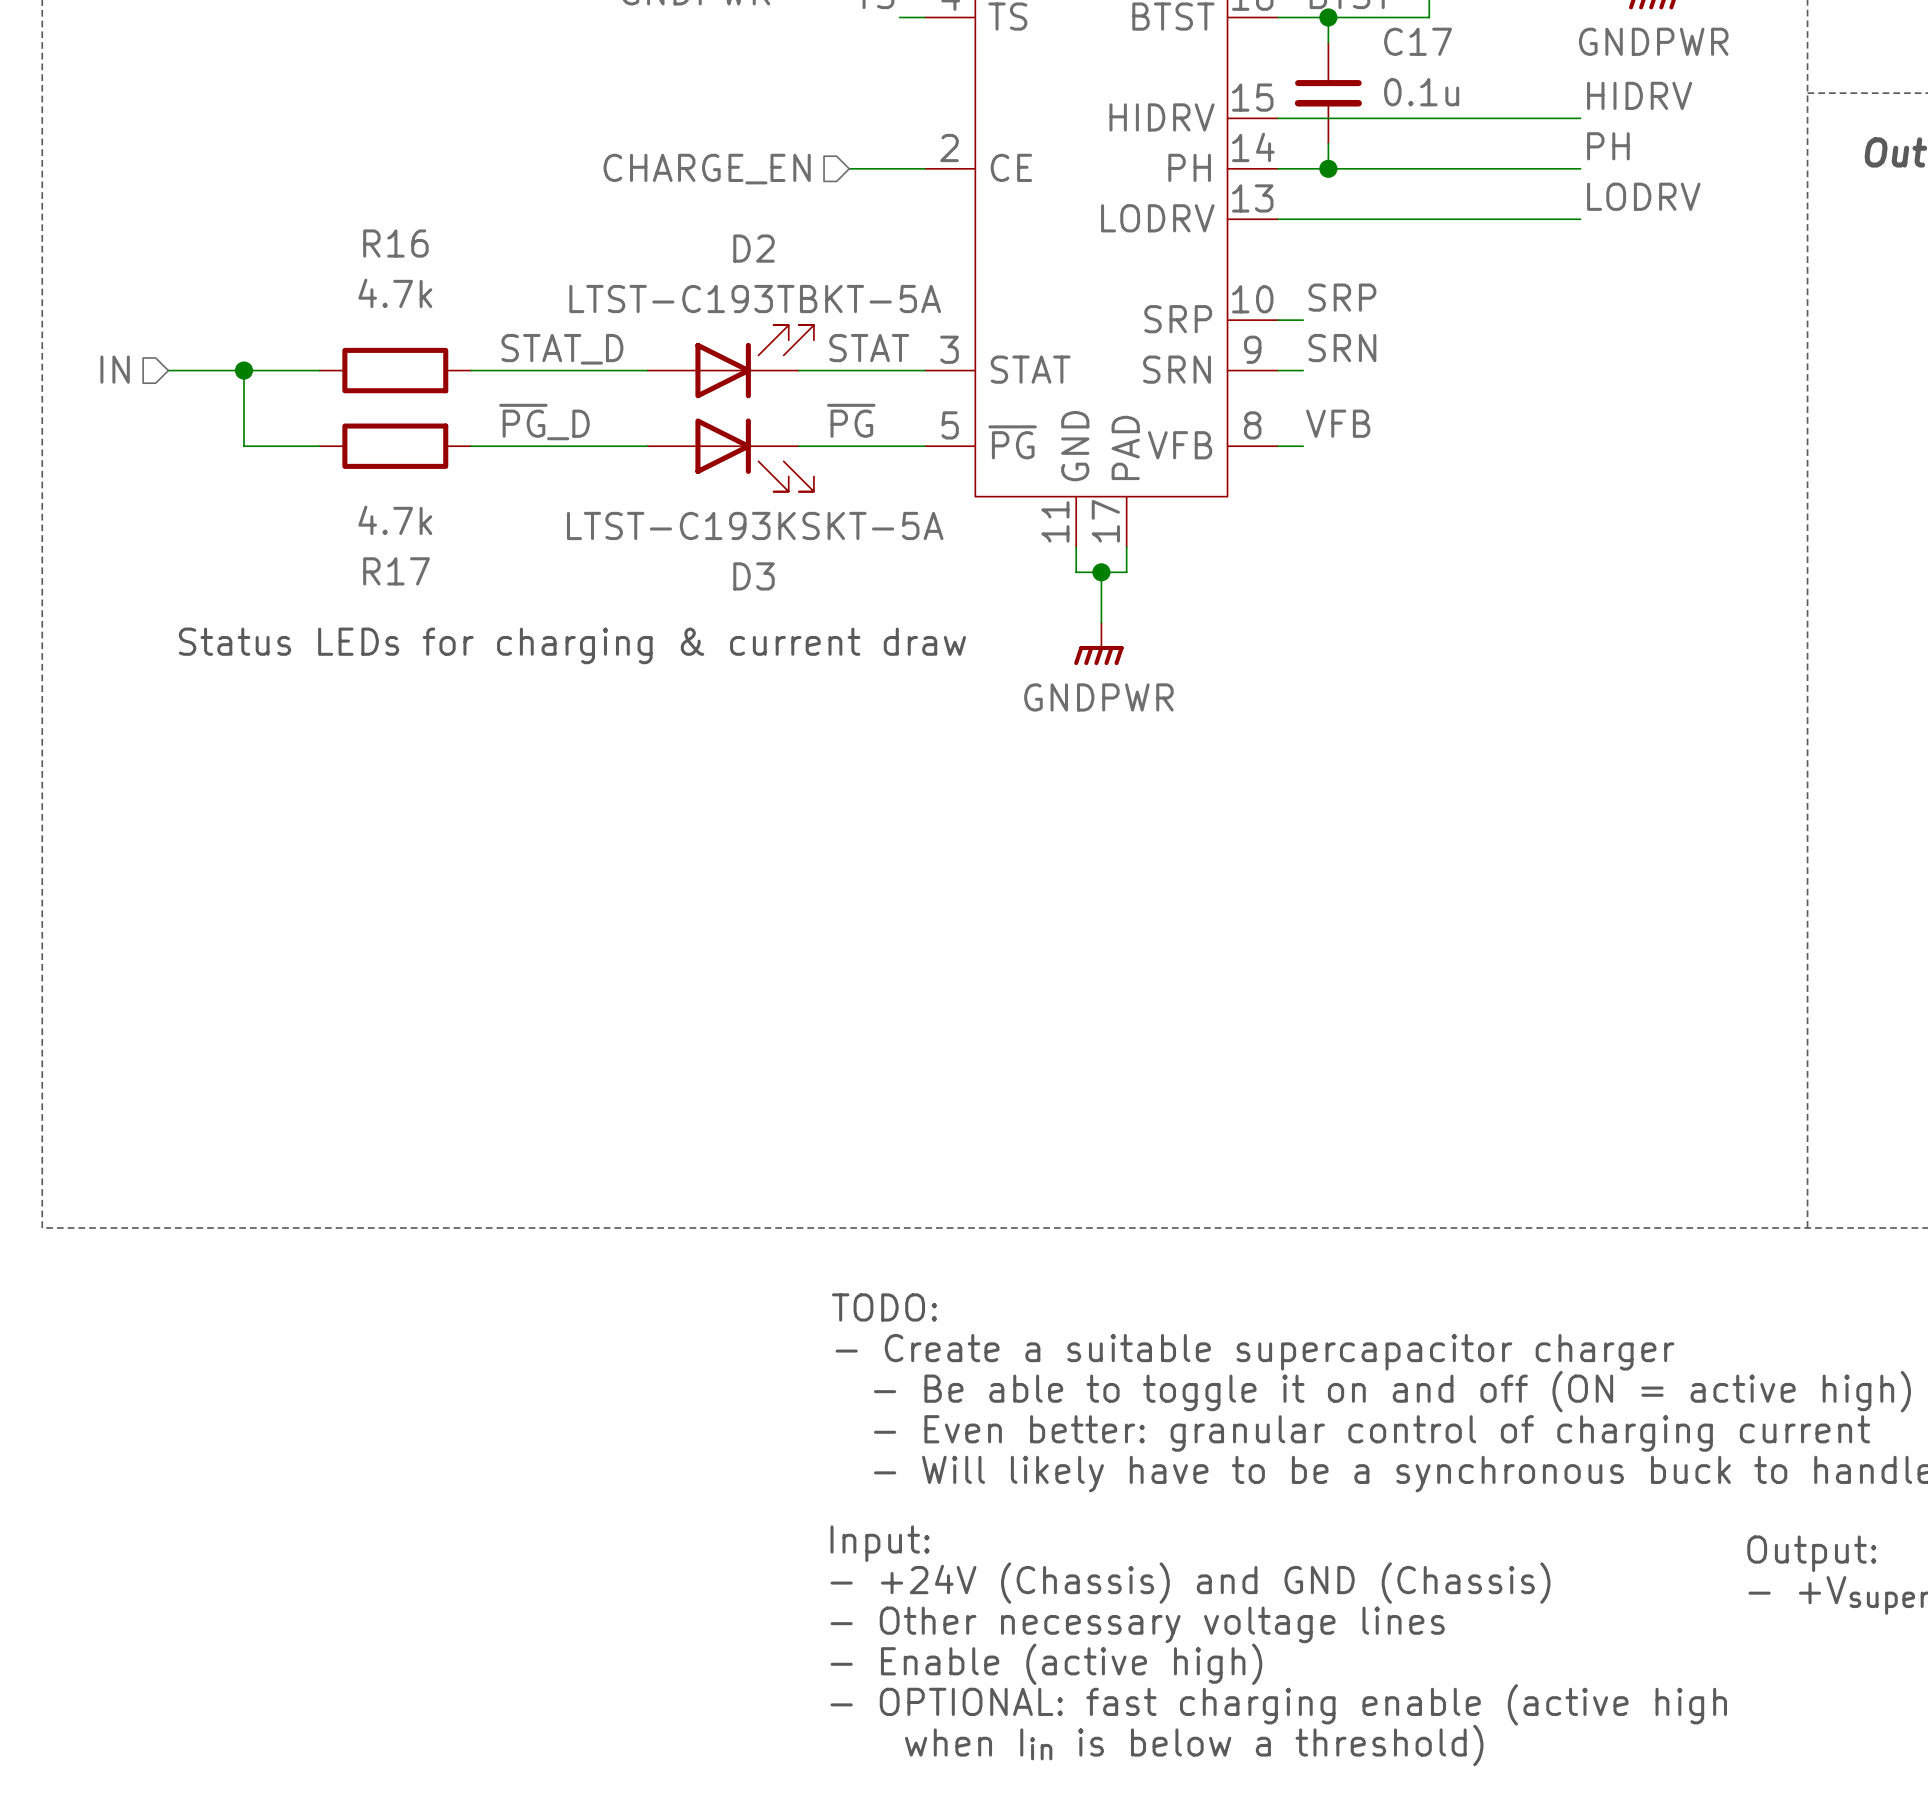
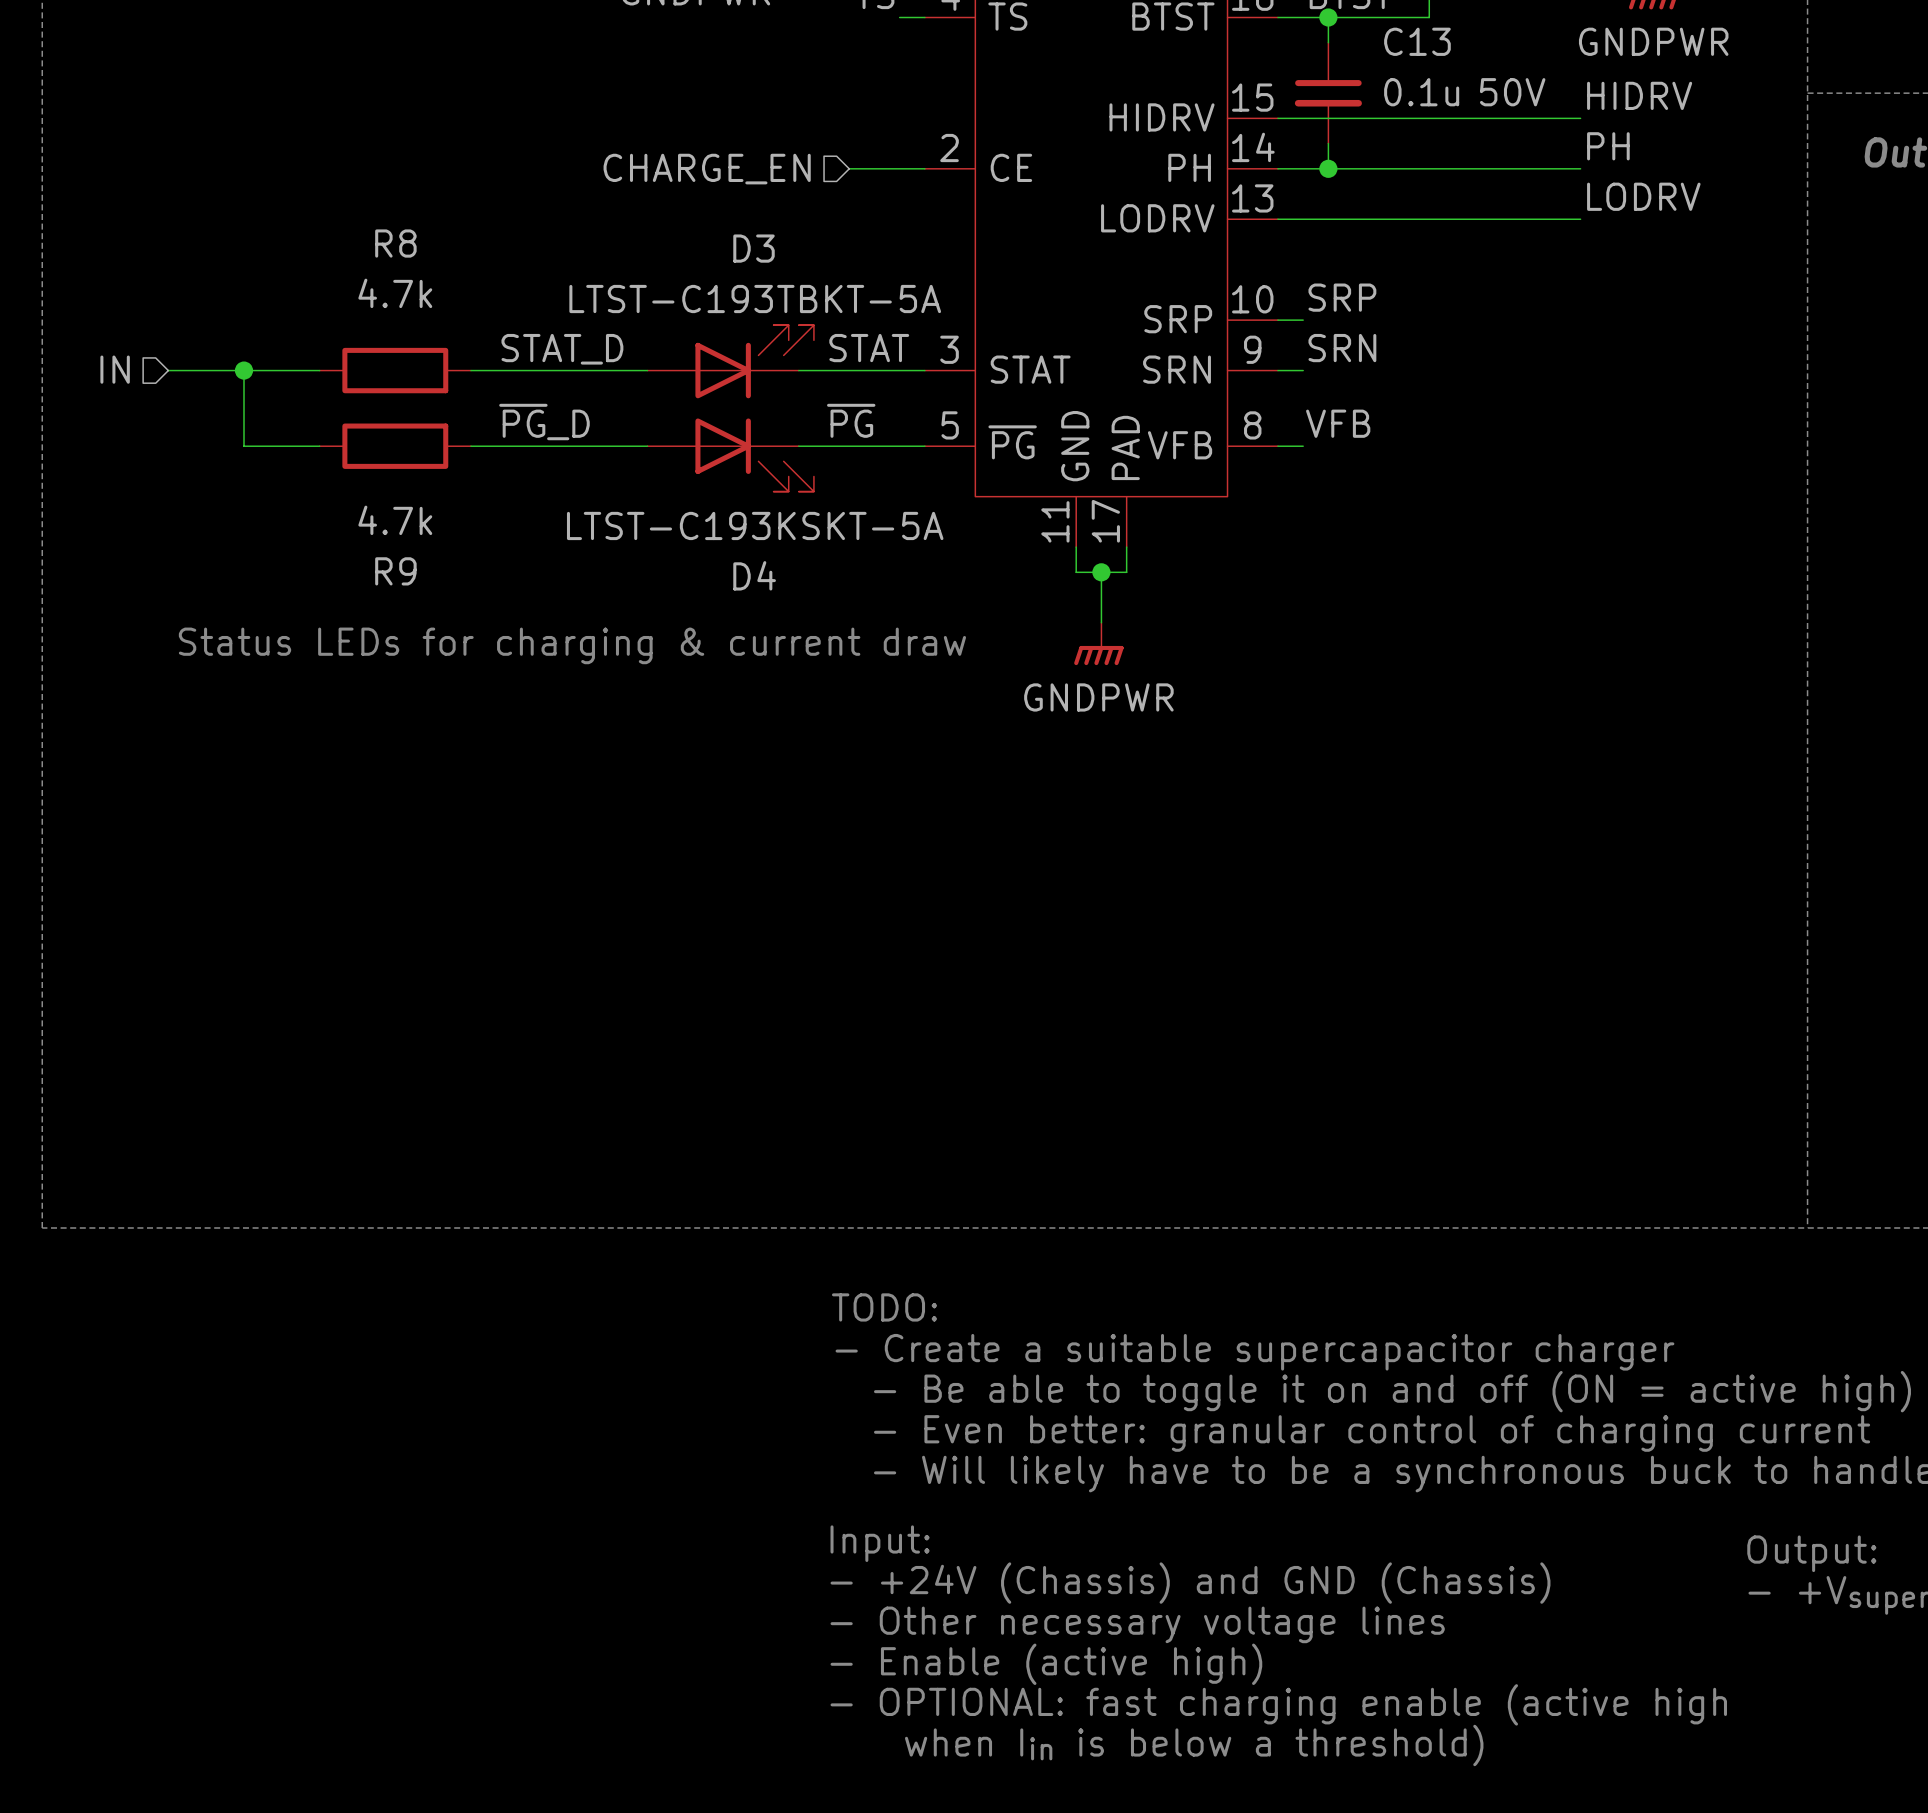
C17 name: C17 (1418, 41) -> C13 (1417, 41)
C17 text: none -> 50V (1512, 92)
R16 name: R16 (395, 243) -> R8 (395, 243)
D2 name: D2 (754, 248) -> D3 (754, 248)
R17 name: R17 (396, 571) -> R9 (395, 571)
D3 name: D3 (754, 576) -> D4 (754, 575)

